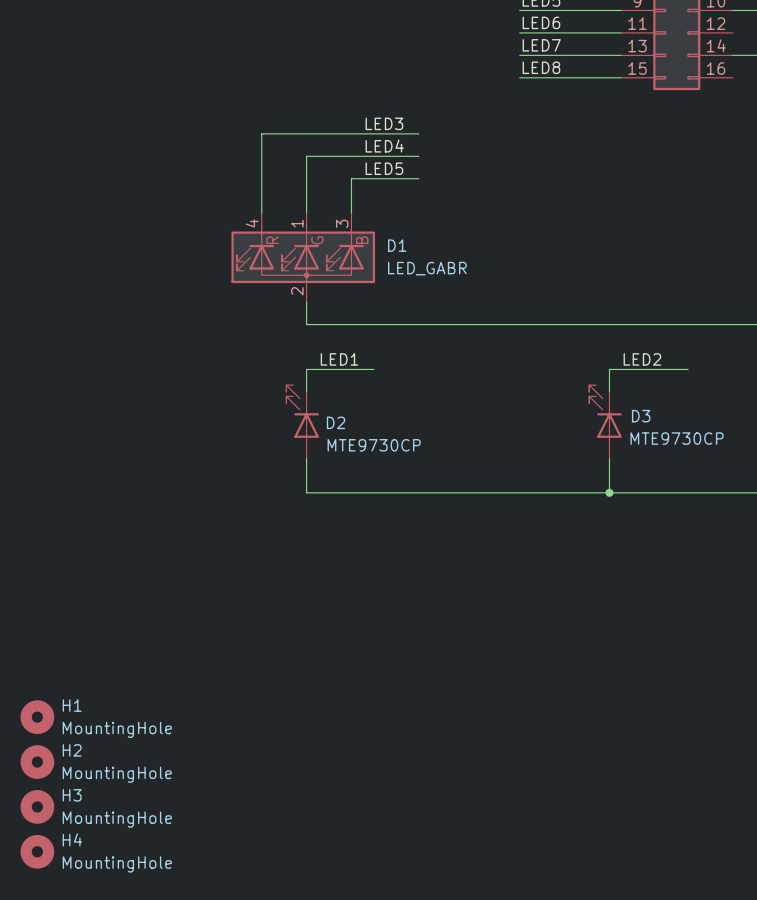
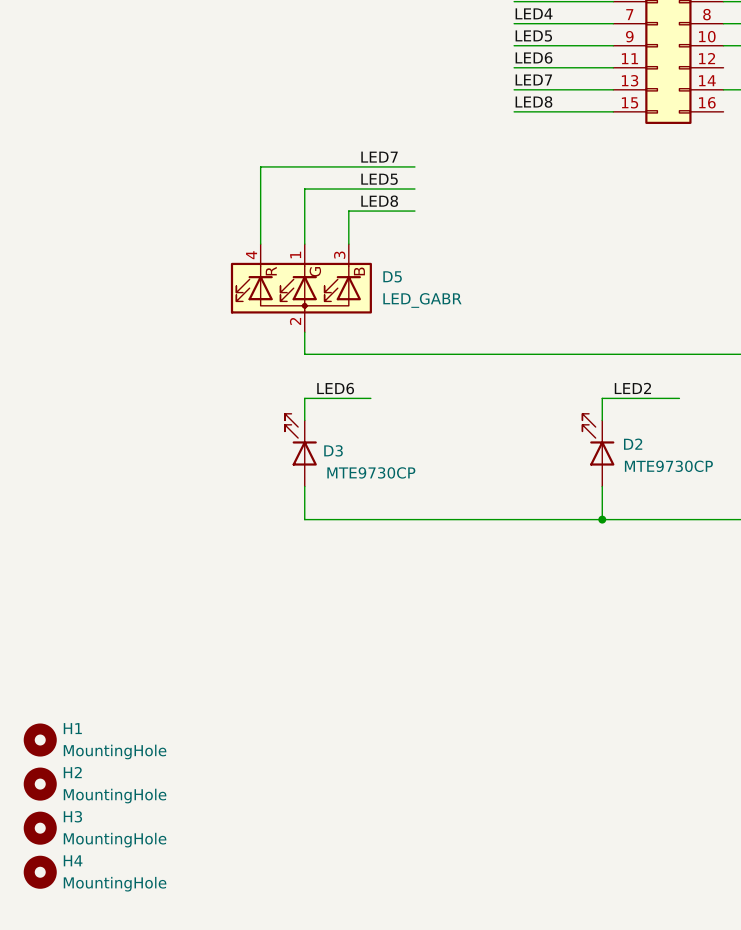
label: LED3 (384, 123) -> LED7 (379, 157)
label: LED4 (384, 146) -> LED5 (379, 179)
label: LED5 (384, 168) -> LED8 (379, 201)
D1 name: D1 (397, 245) -> D5 (392, 276)
label: LED1 (339, 359) -> LED6 (335, 388)
D3 name: D3 (641, 416) -> D2 (633, 444)
D2 name: D2 (336, 422) -> D3 (333, 450)

